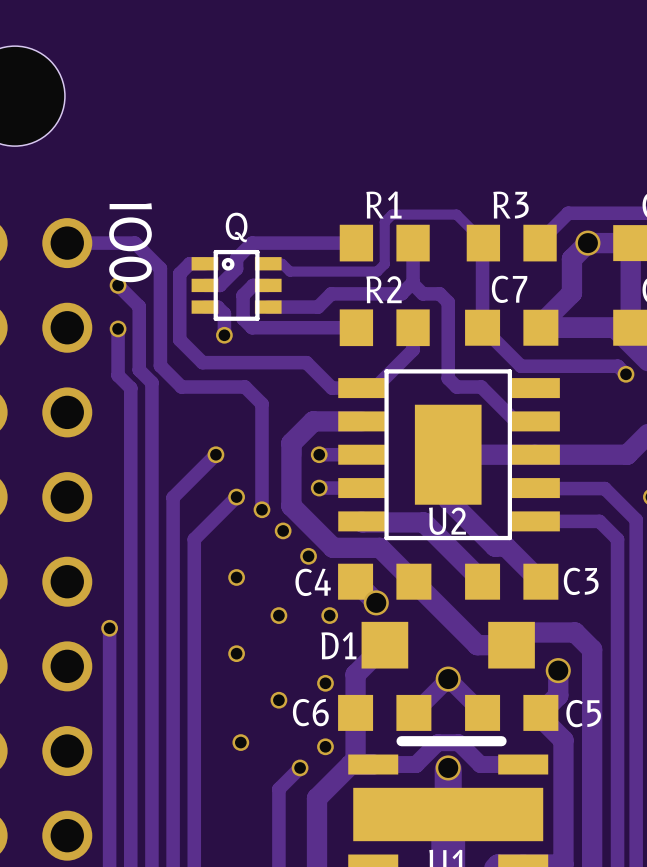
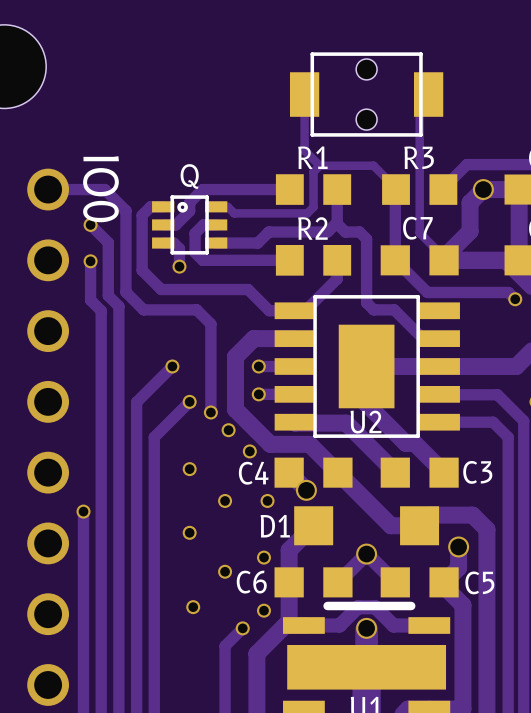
track: none -> (304, 94) (304, 150) (319, 165)
part: none -> (366, 94)
track: none -> (428, 94) (419, 103) (419, 232) (444, 257)

